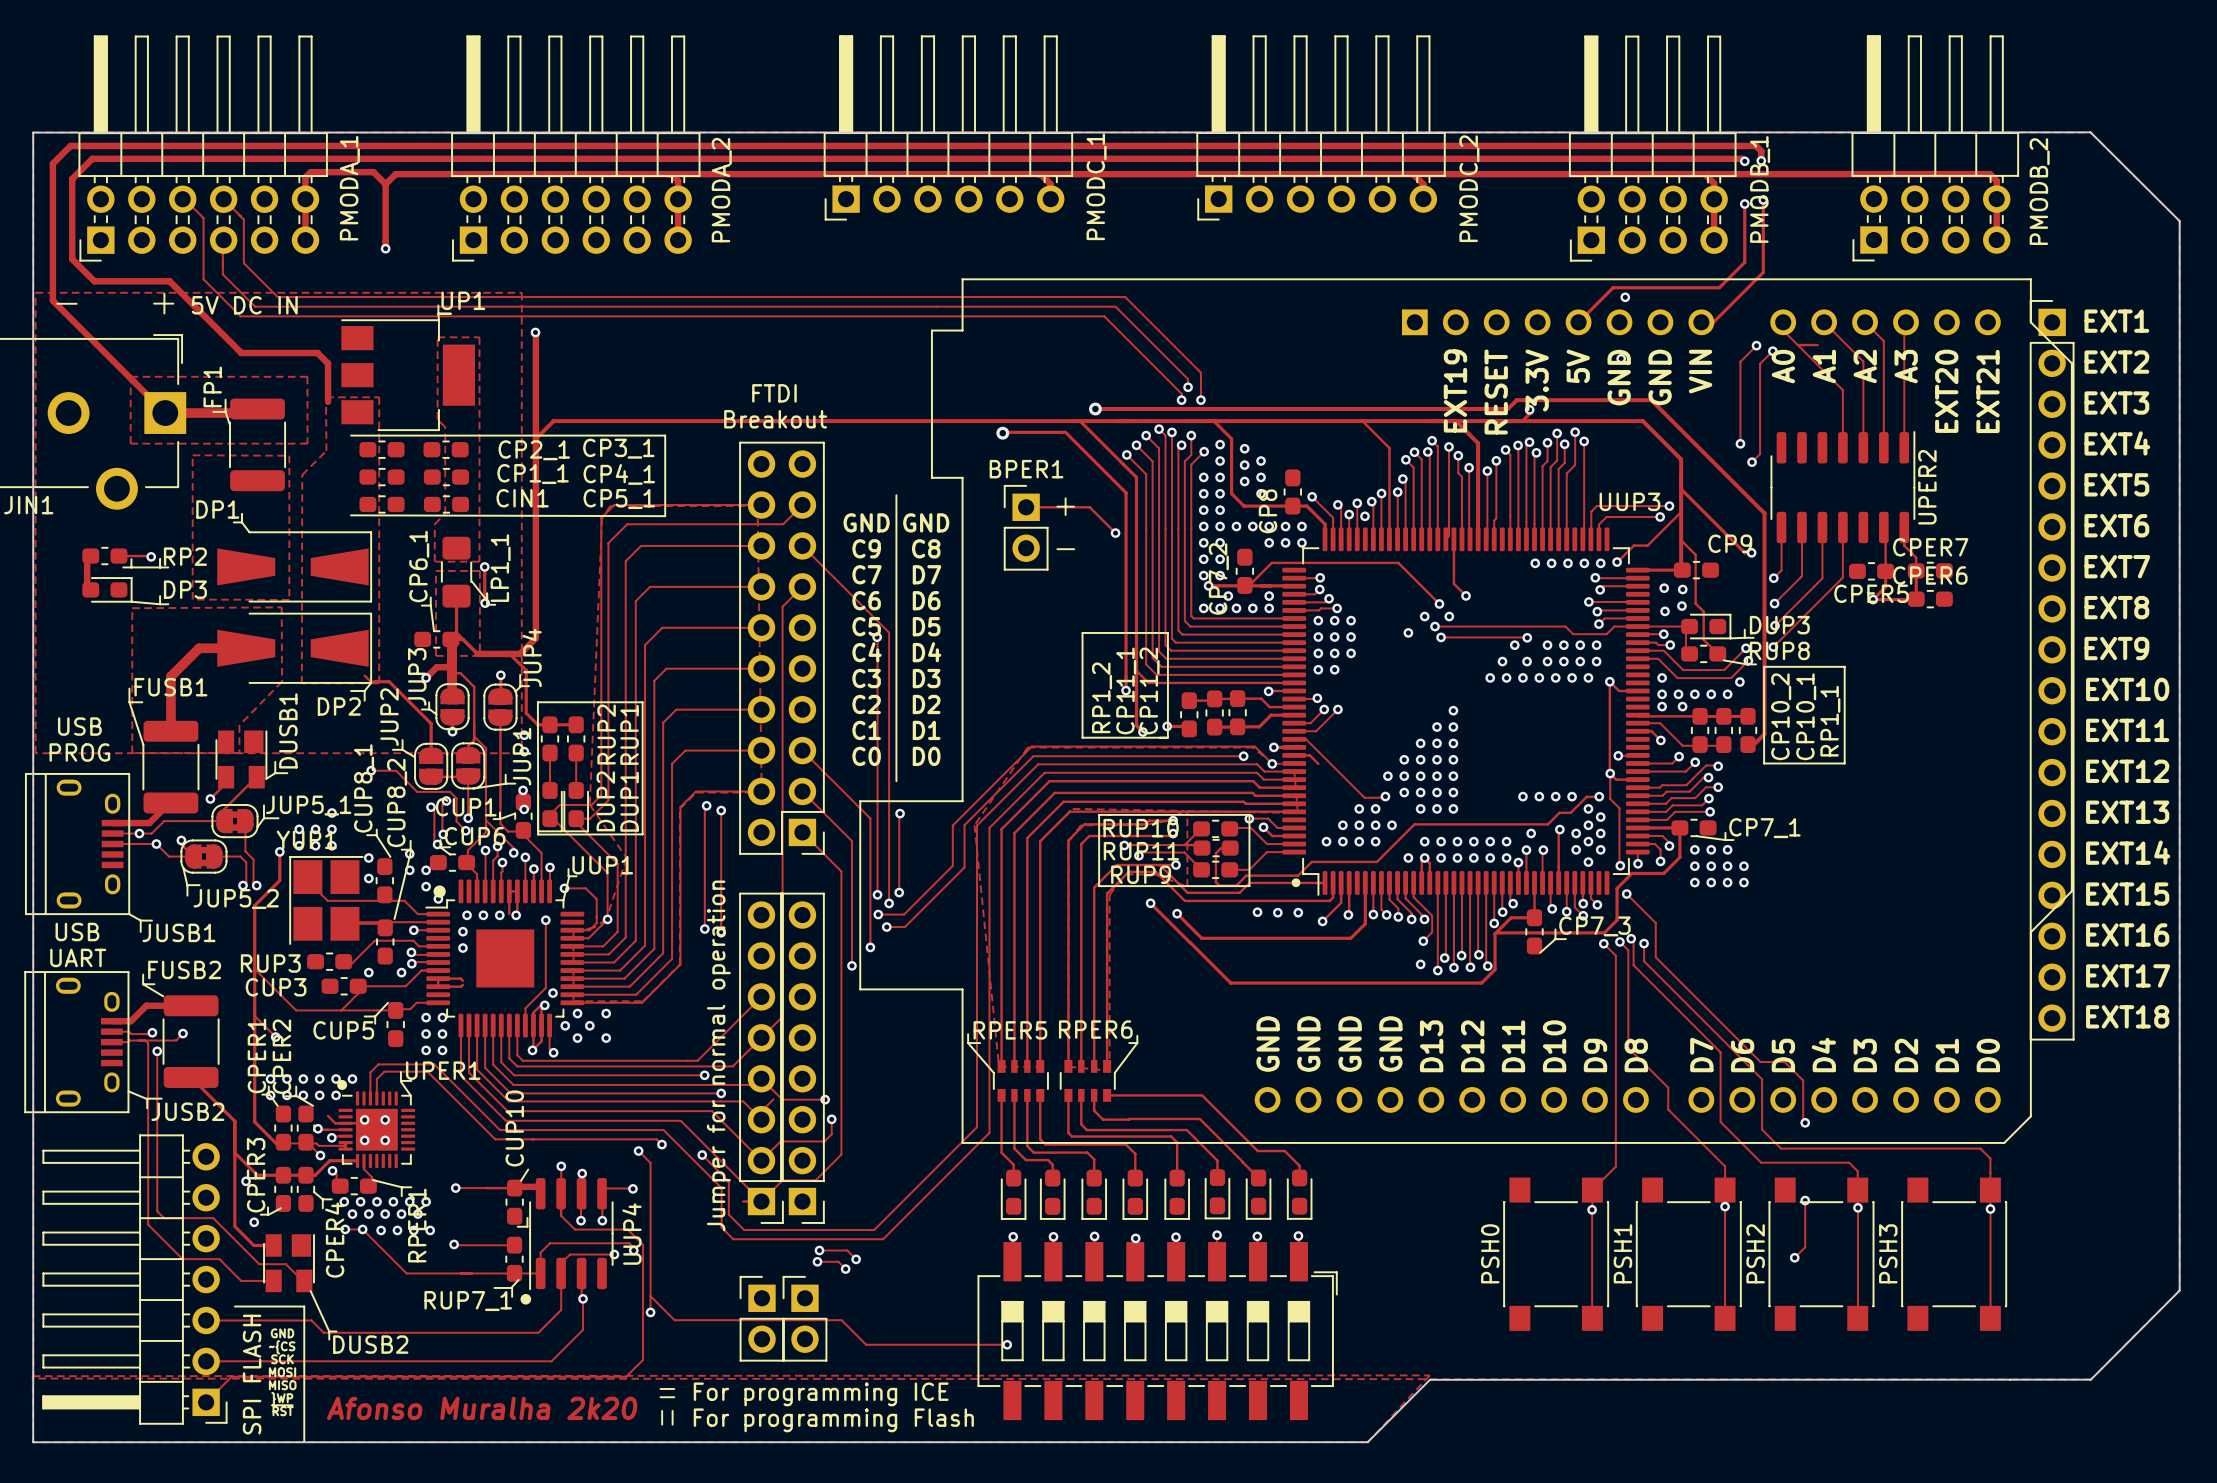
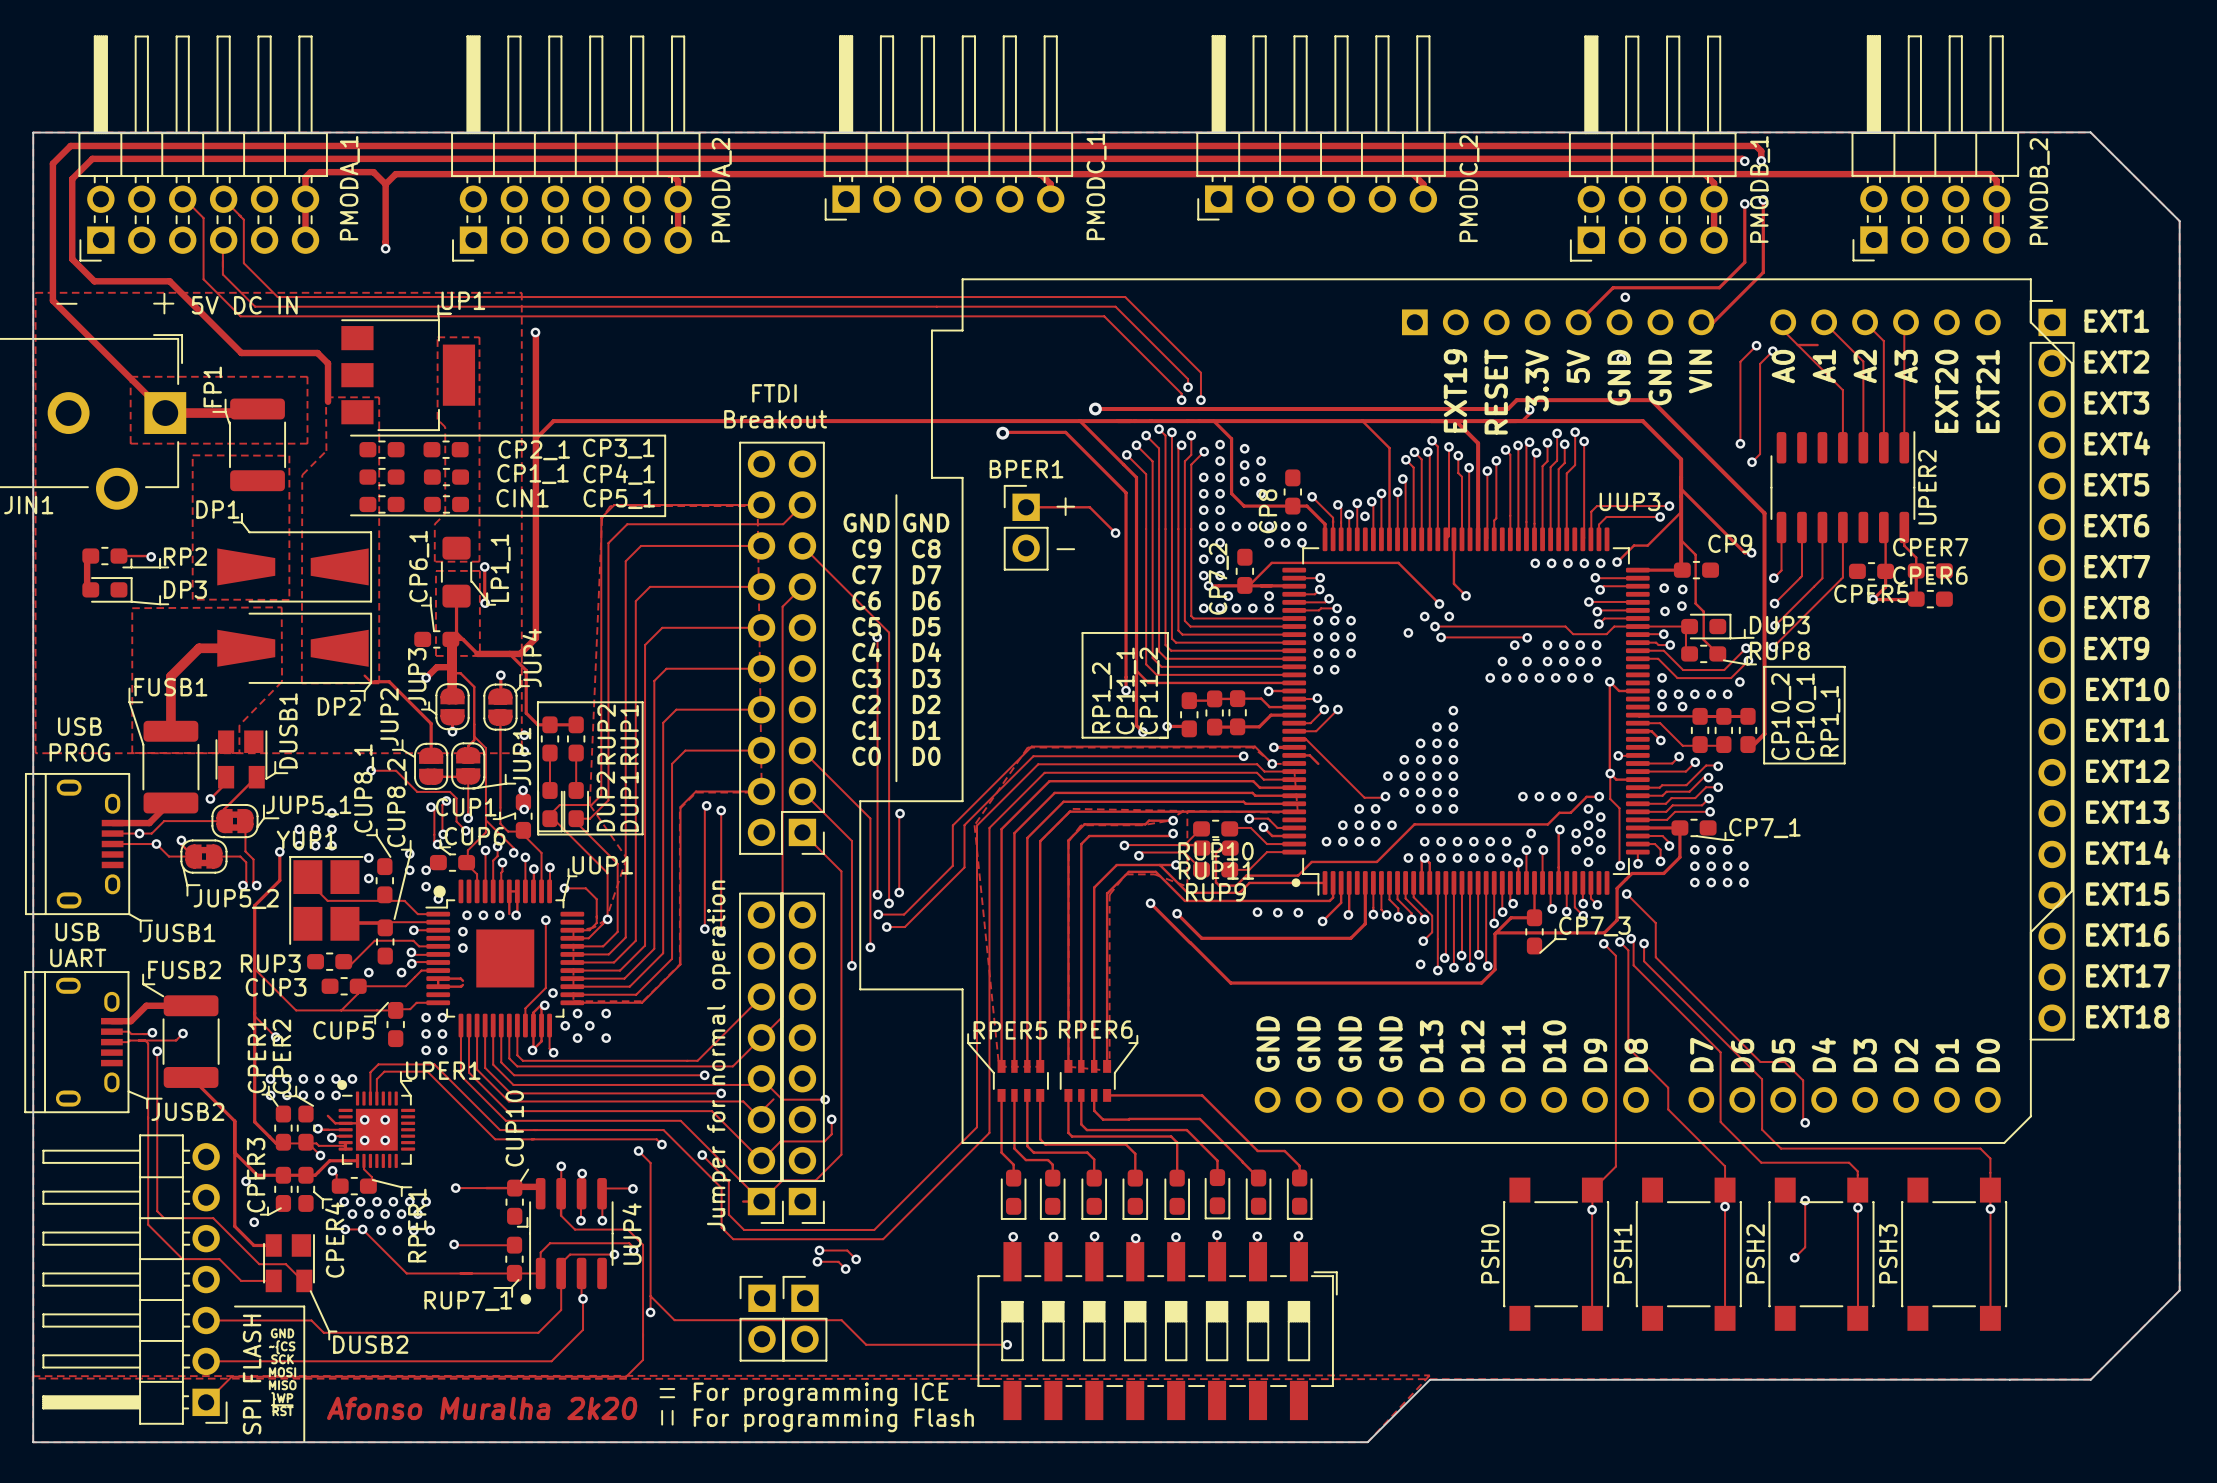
line: (1099, 814) (1249, 814) (1249, 886) (1099, 886) (1099, 814) -> none
RUP10 name position: RUP10 (1141, 828) -> RUP10 (1216, 851)
RUP11 name position: RUP11 (1141, 851) -> RUP11 (1216, 870)
RUP9 name position: RUP9 (1141, 874) -> RUP9 (1216, 892)

